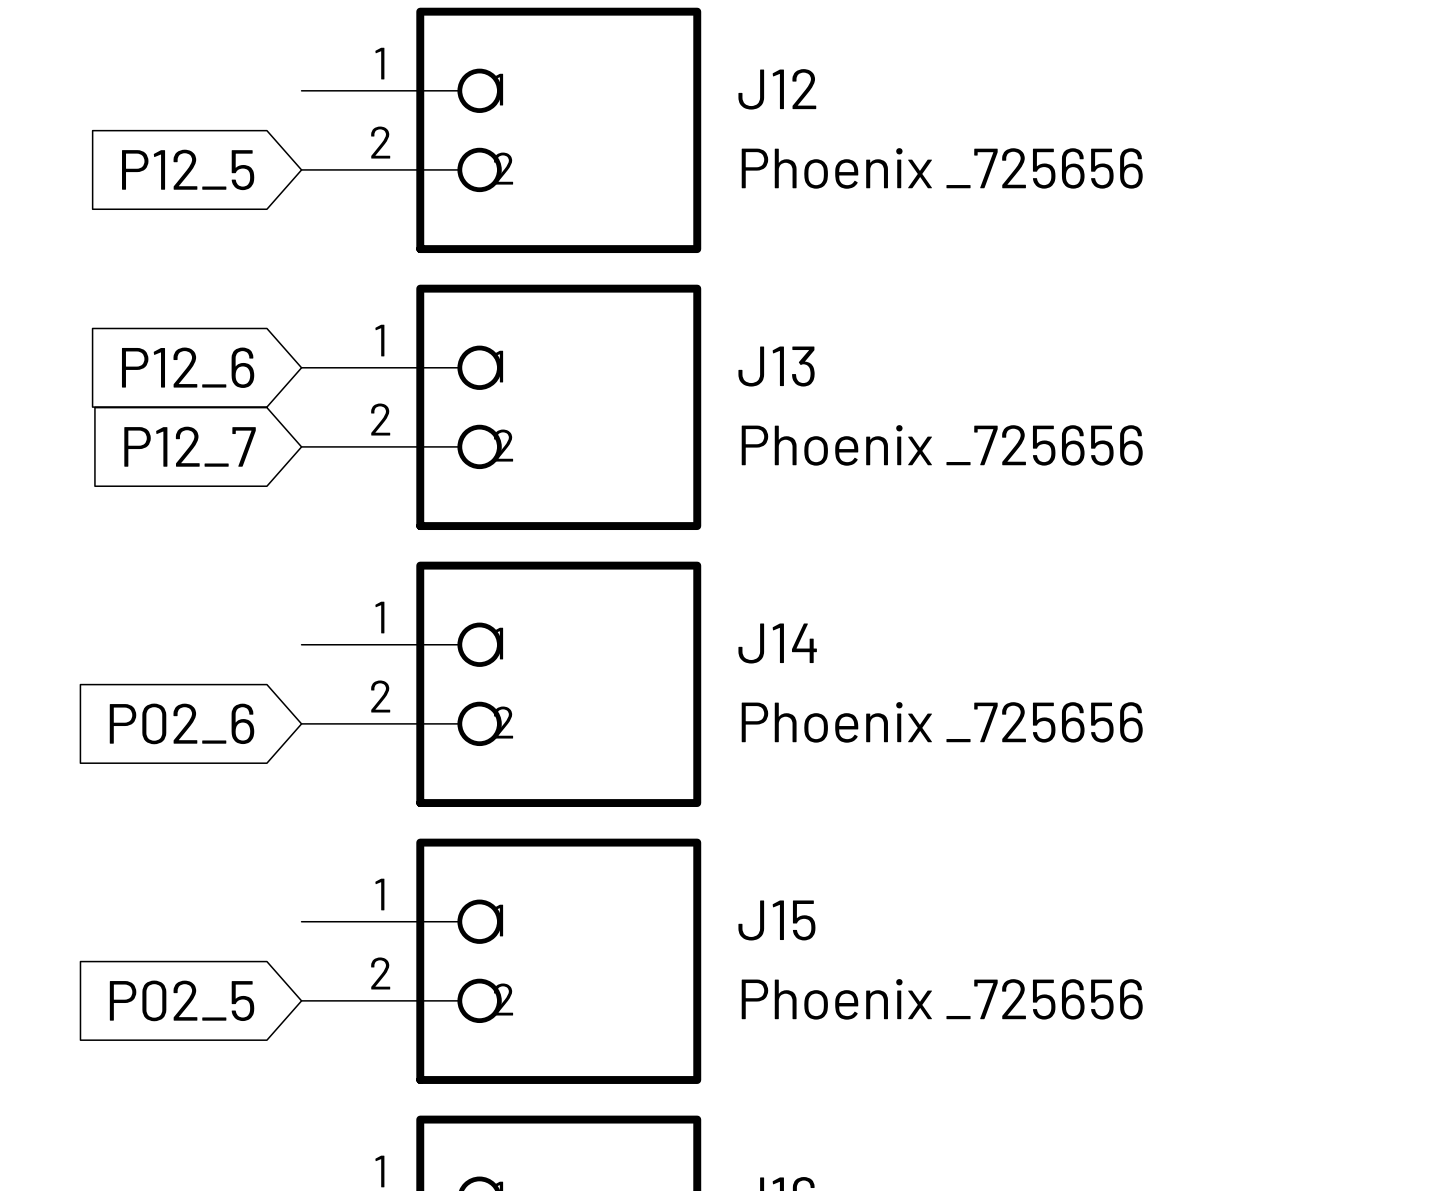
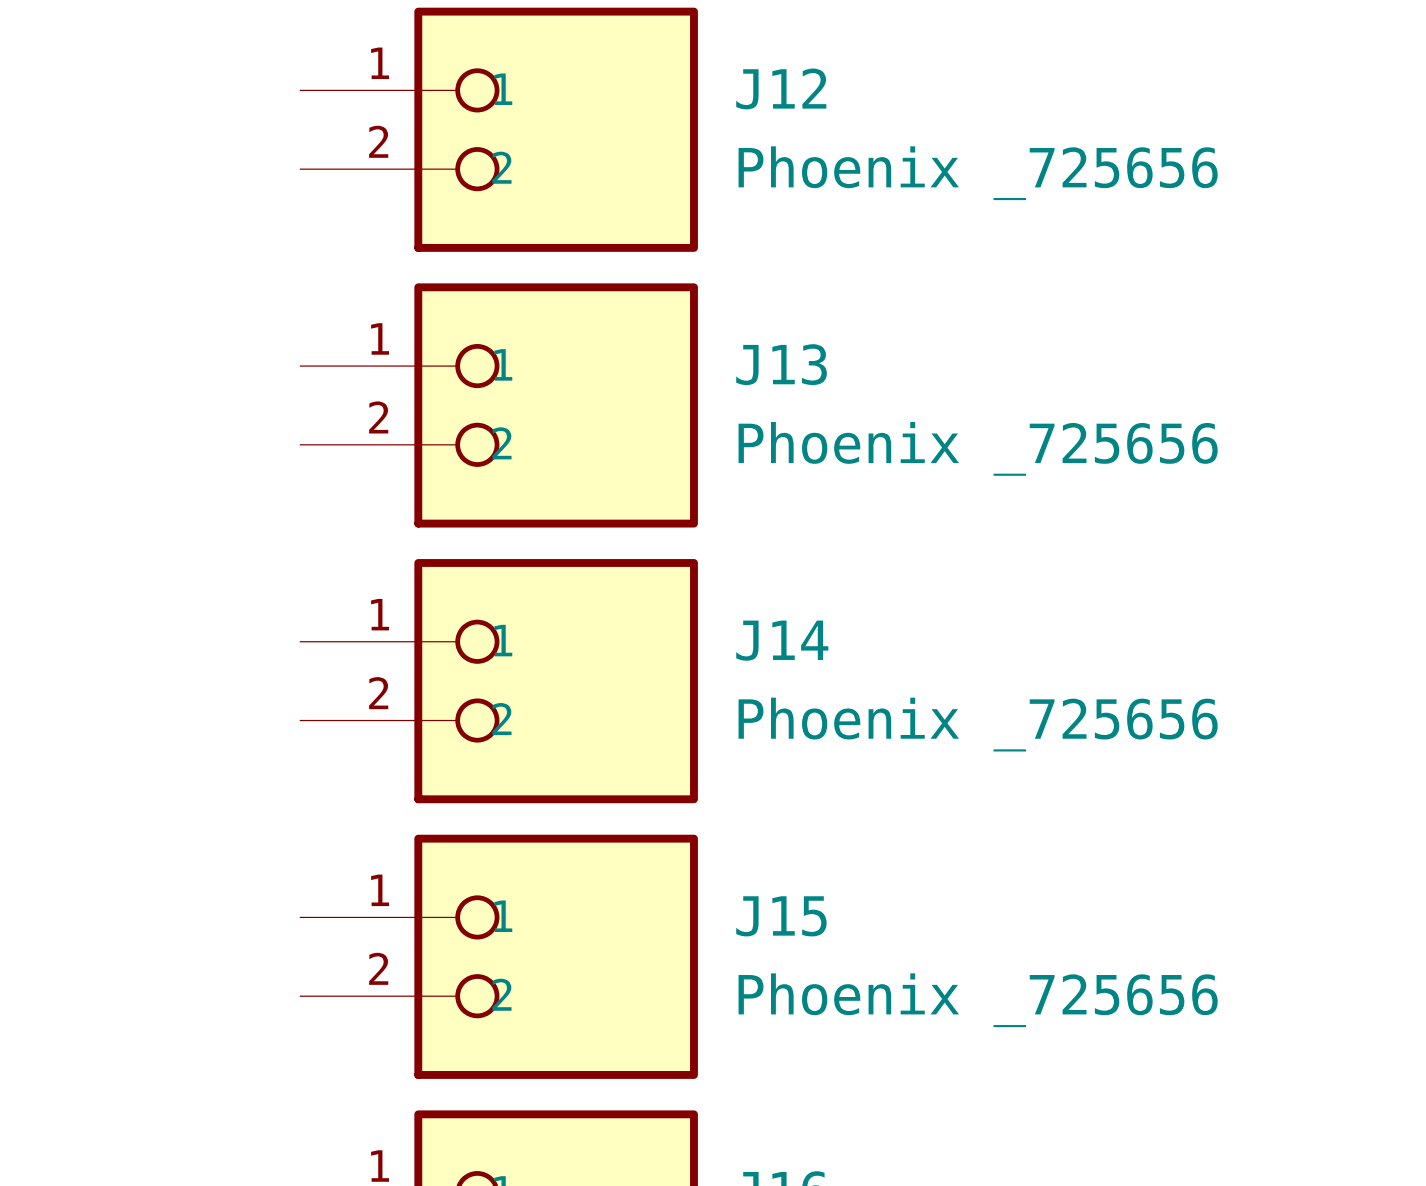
global label: P12_5 (188, 169) -> none
global label: P12_6 (188, 367) -> none
global label: P12_7 (190, 446) -> none
global label: P02_6 (182, 723) -> none
global label: P02_5 (182, 1000) -> none

